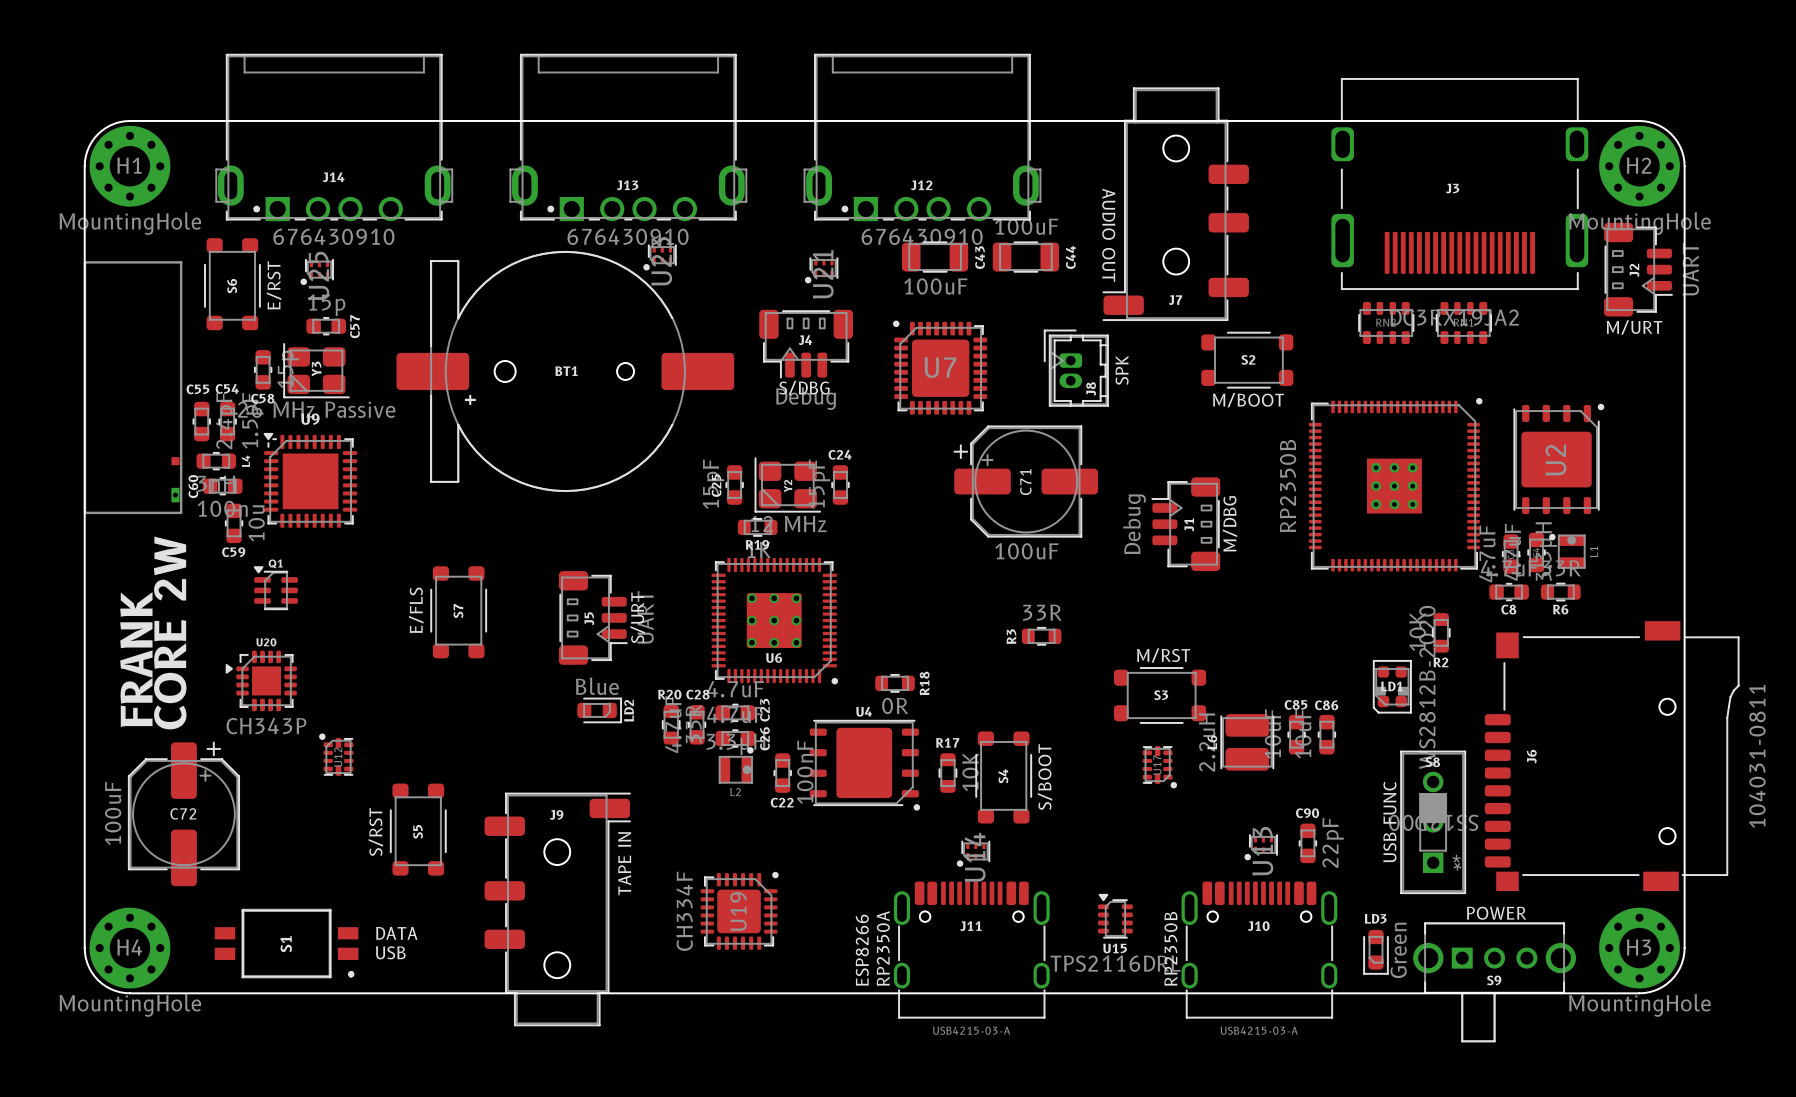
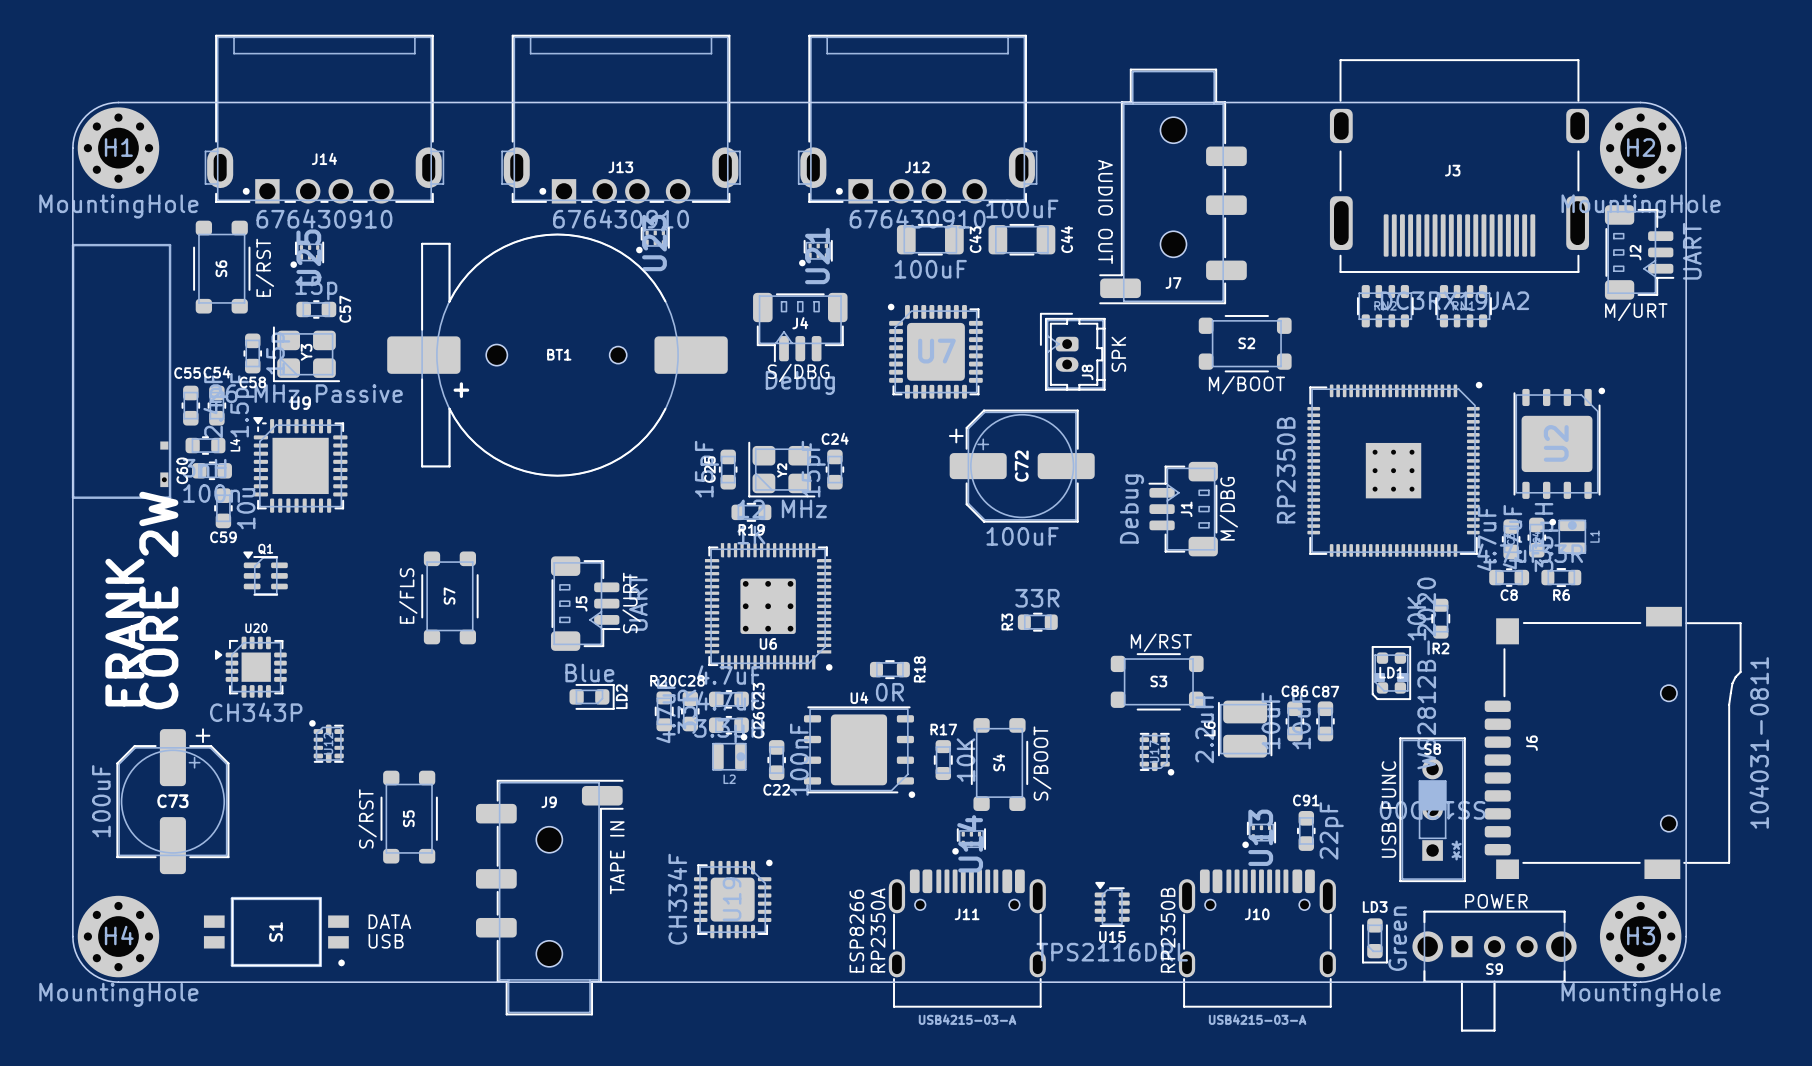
C71 name: C71 (1025, 482) -> C72 (1021, 466)
C85 name: C85 (1296, 704) -> C86 (1294, 691)
C86 name: C86 (1326, 705) -> C87 (1325, 691)
C72 name: C72 (183, 813) -> C73 (172, 801)
C90 name: C90 (1307, 813) -> C91 (1306, 800)

